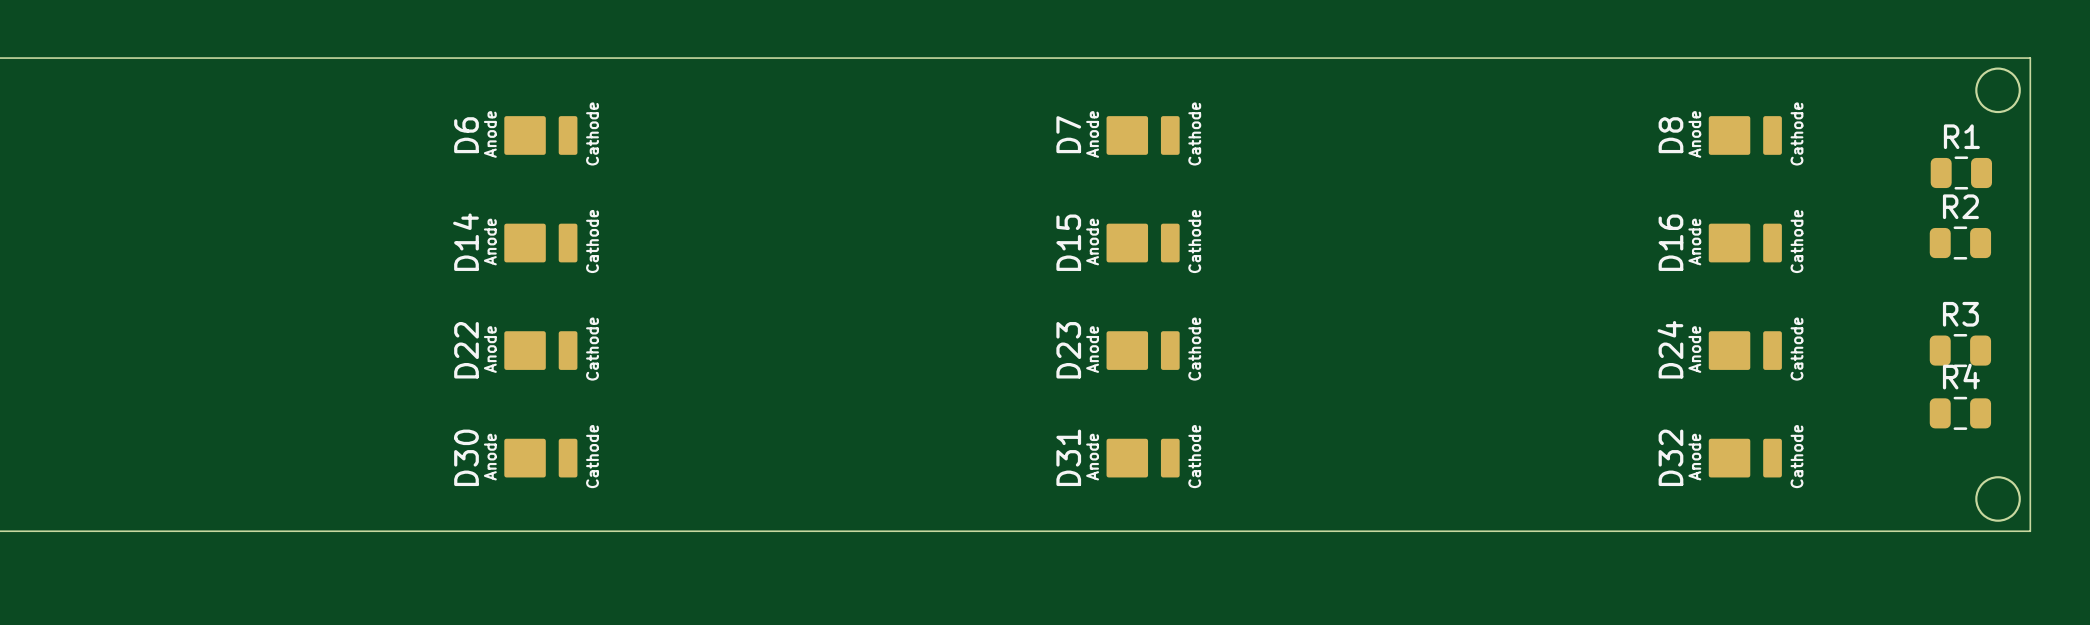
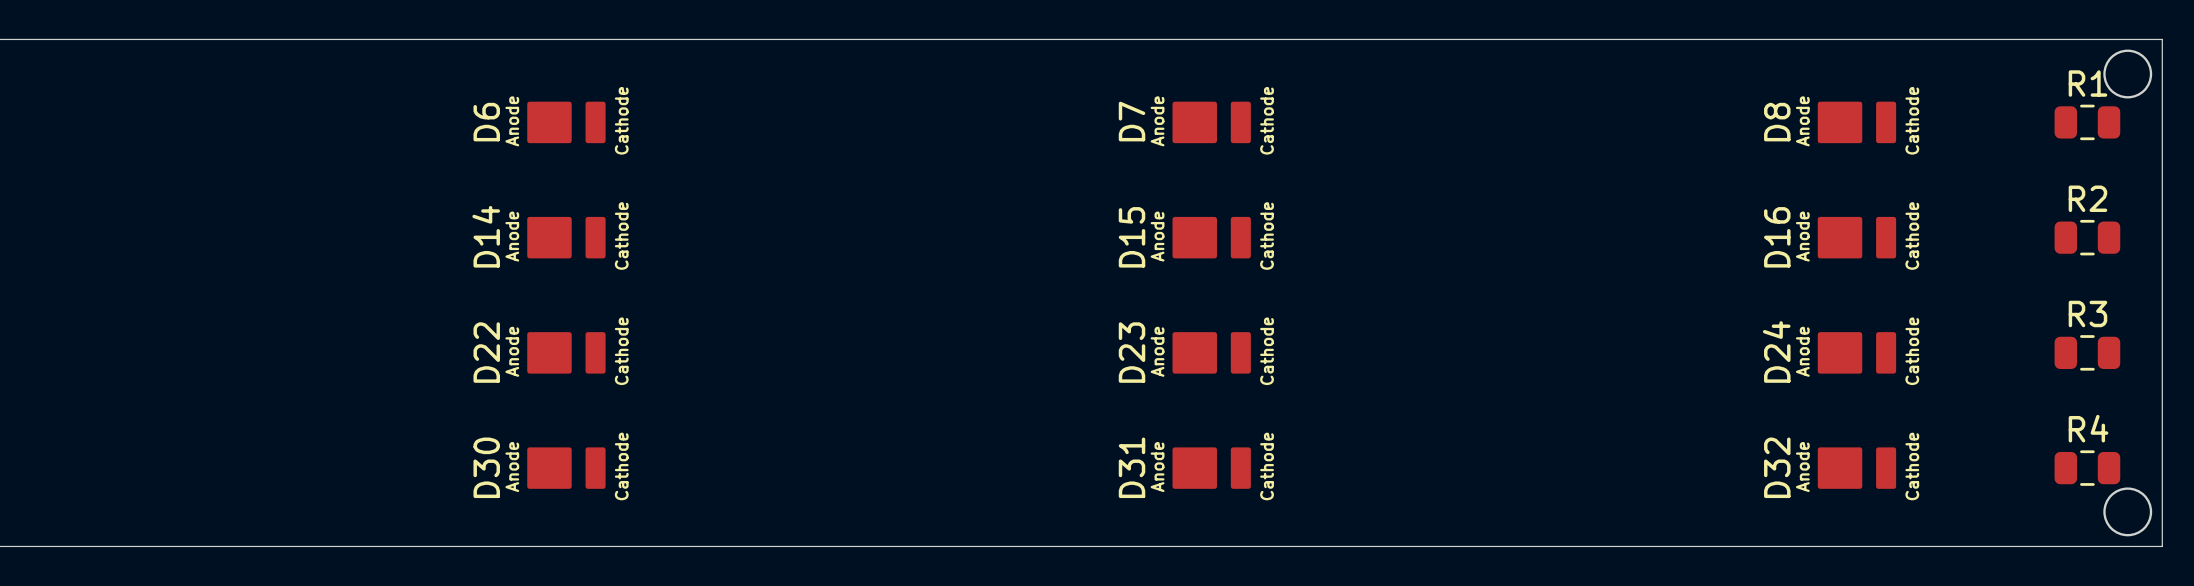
R1 position: (1961, 172) -> (2087, 122)
R4 position: (1960, 413) -> (2087, 468)

